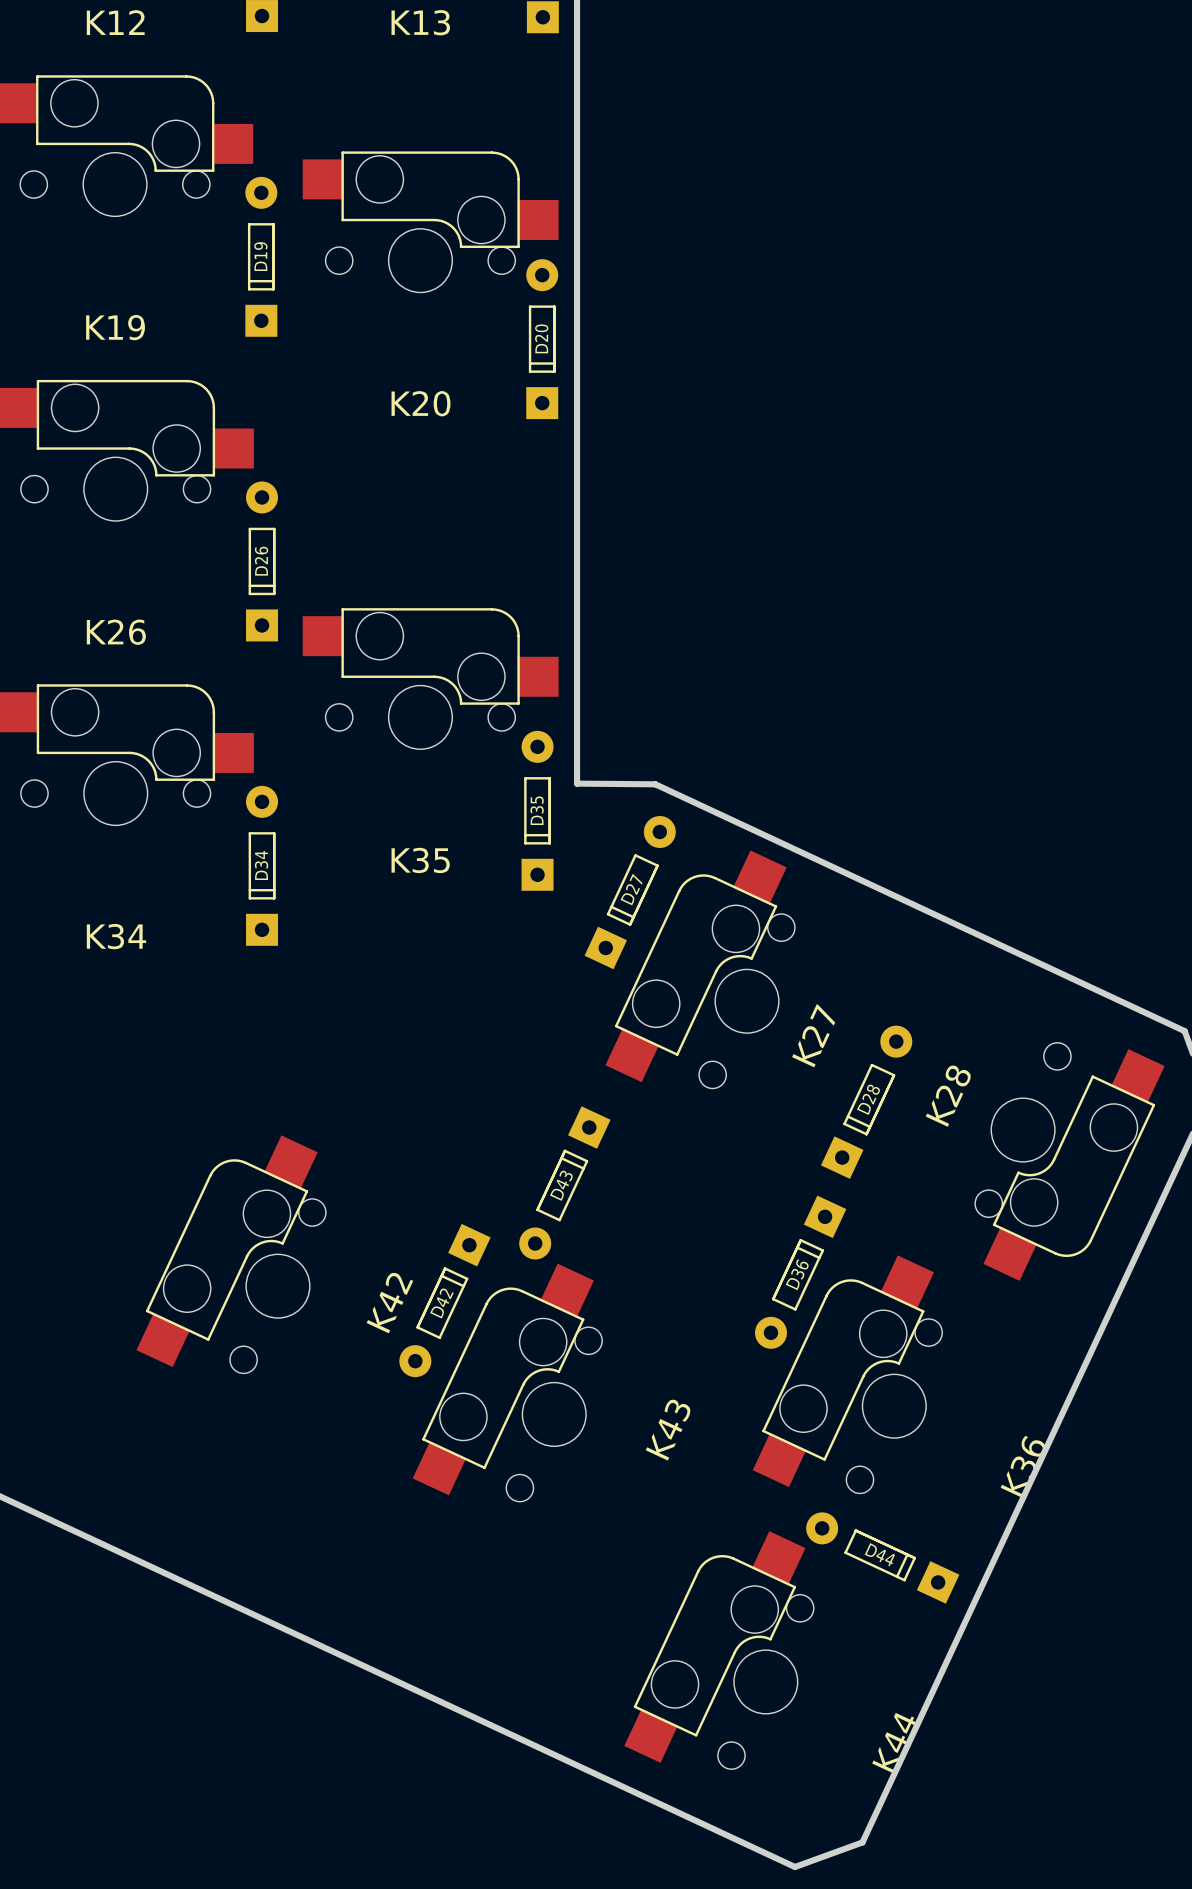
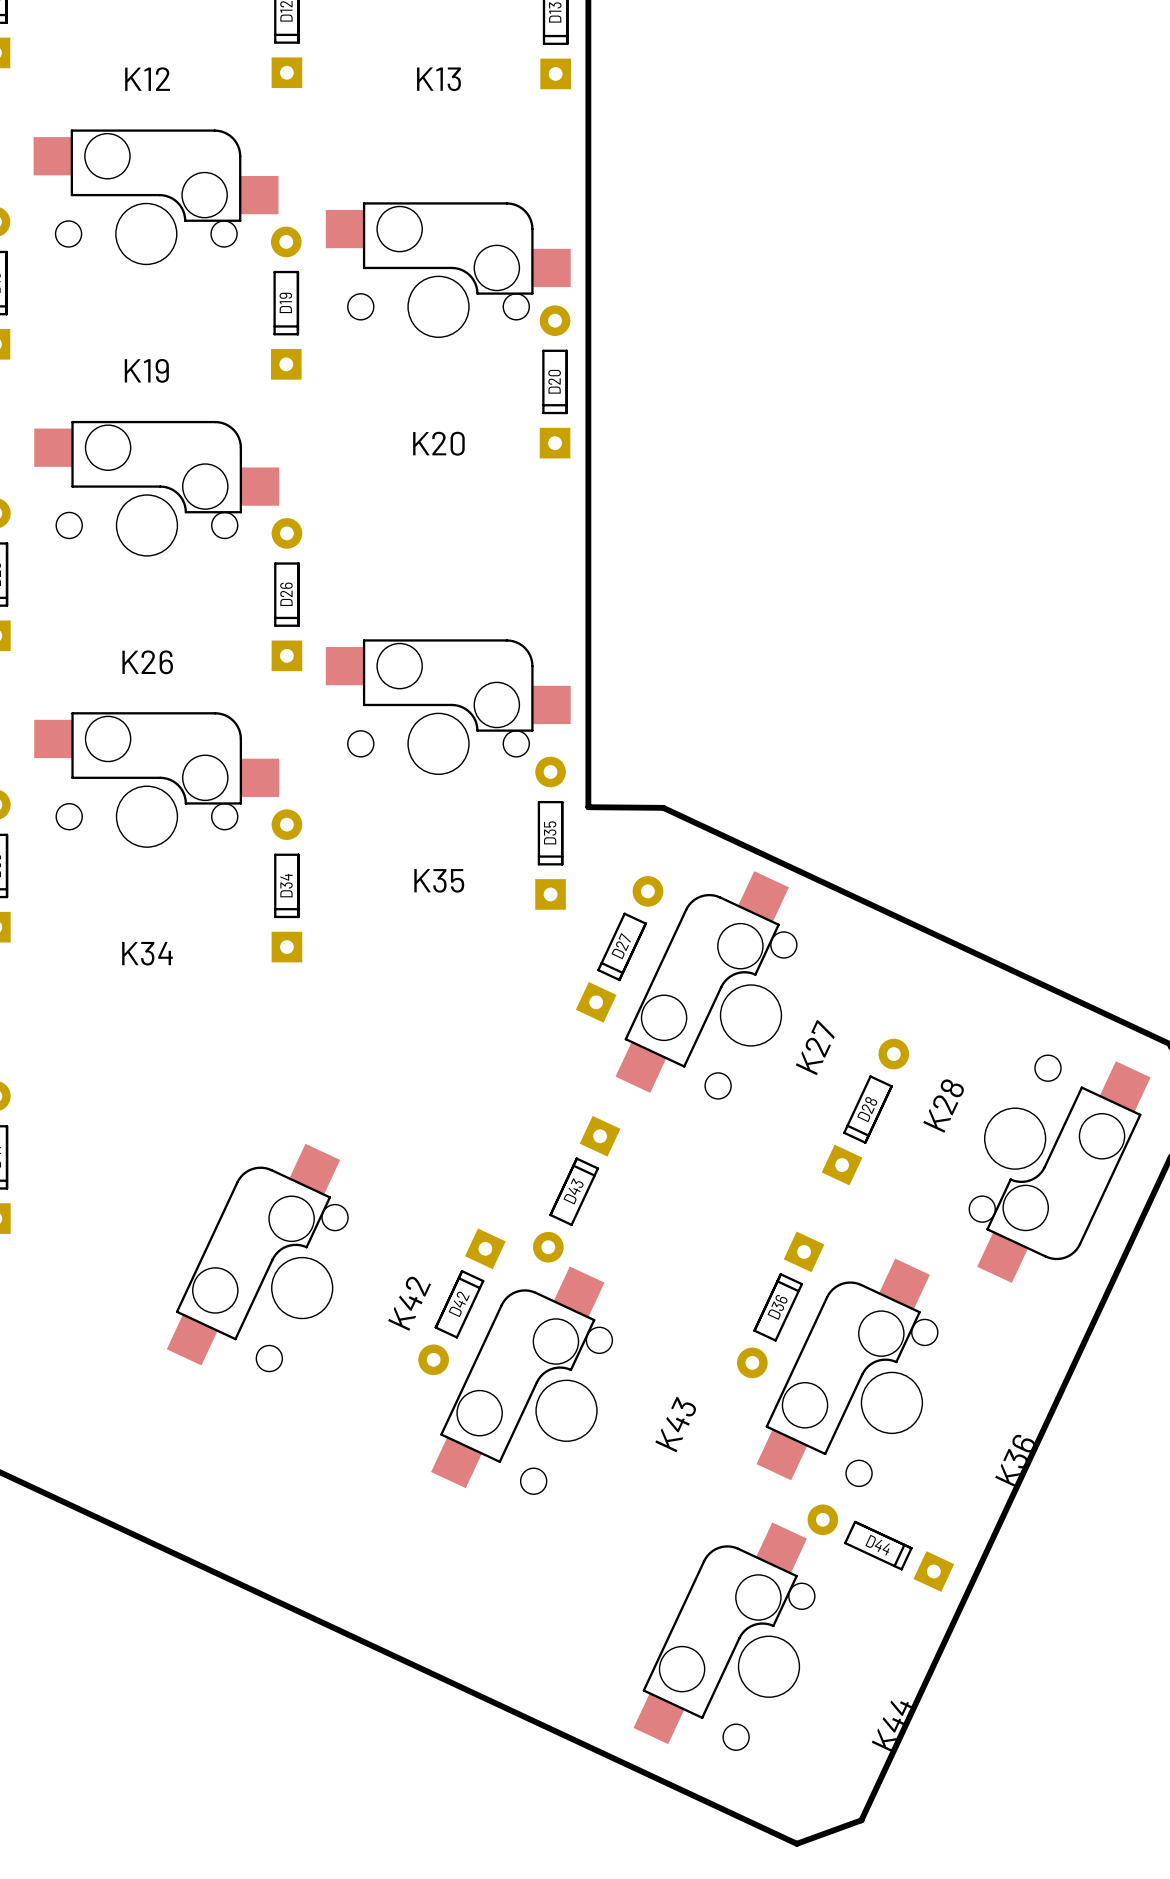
D27 position: (630, 892) -> (619, 949)
D36 position: (800, 1272) -> (780, 1304)

